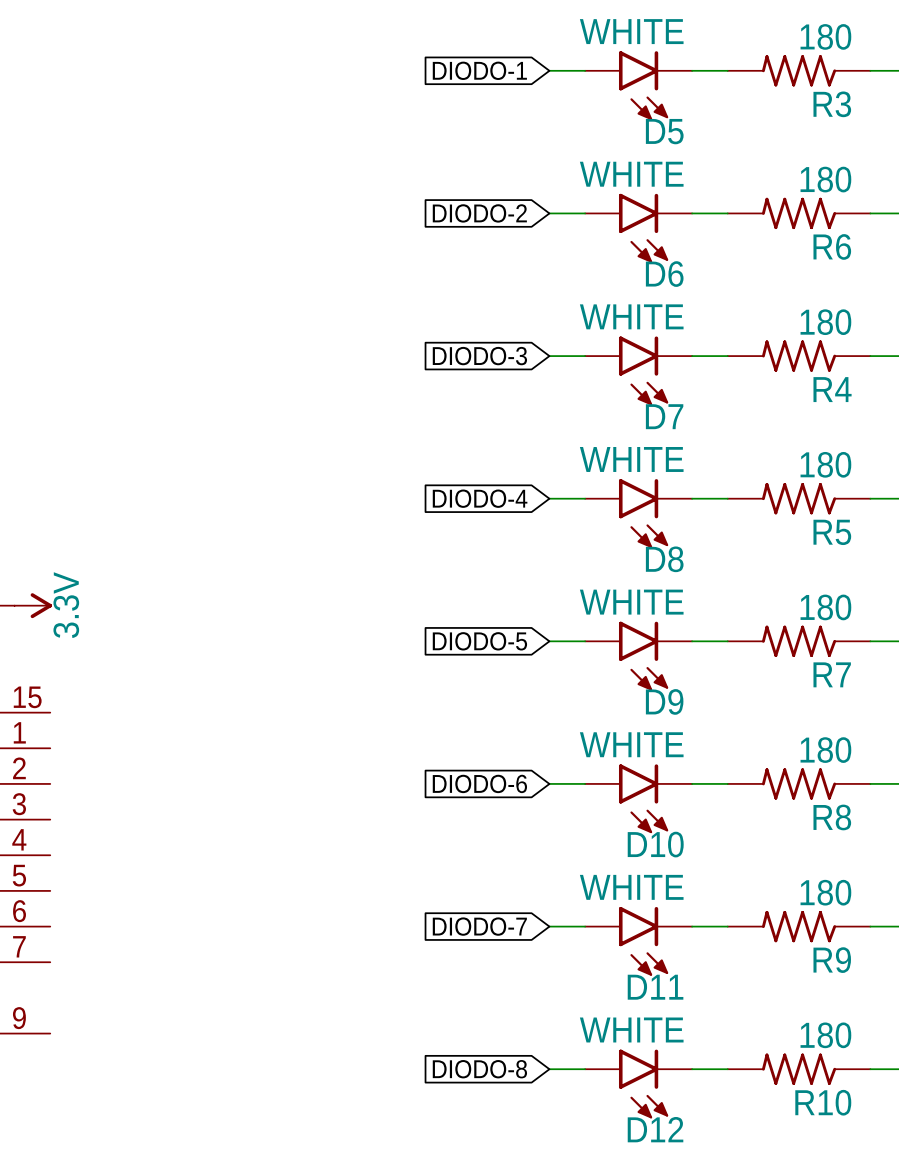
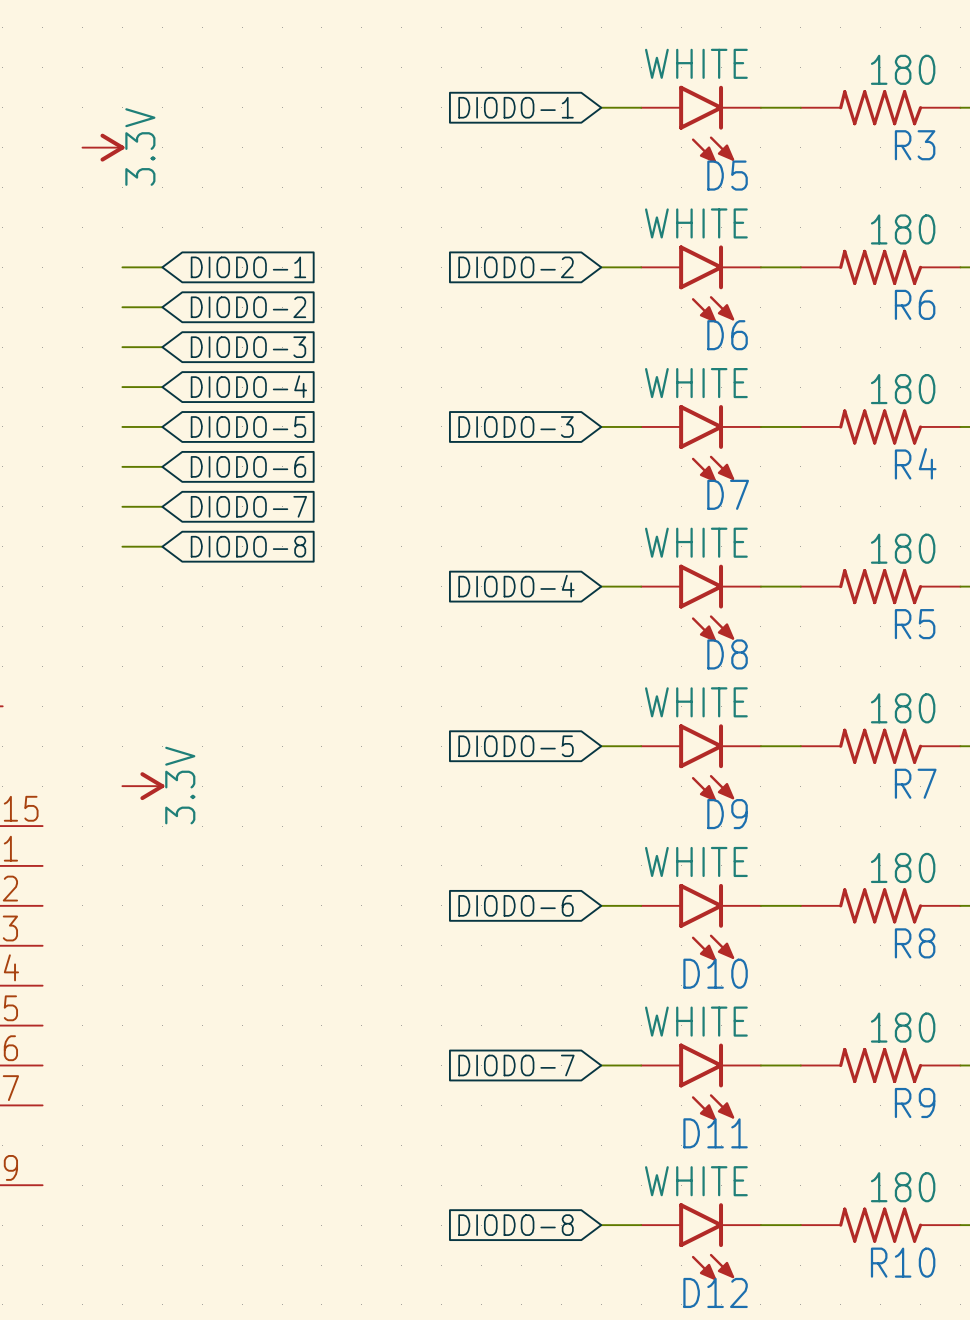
power symbol: none -> 3.3V (103, 147)
wire: none -> (122, 267) (162, 267)
global label: none -> DIODO-1 (248, 267)
wire: none -> (122, 307) (162, 307)
global label: none -> DIODO-2 (248, 307)
wire: none -> (122, 347) (162, 347)
global label: none -> DIODO-3 (248, 347)
wire: none -> (122, 387) (162, 387)
global label: none -> DIODO-4 (248, 386)
wire: none -> (122, 426) (162, 426)
global label: none -> DIODO-5 (248, 426)
wire: none -> (122, 466) (162, 466)
global label: none -> DIODO-6 (248, 466)
wire: none -> (122, 506) (162, 506)
global label: none -> DIODO-7 (248, 506)
wire: none -> (122, 546) (162, 546)
global label: none -> DIODO-8 (248, 546)
power symbol position: 3.3V (33, 605) -> 3.3V (143, 786)

